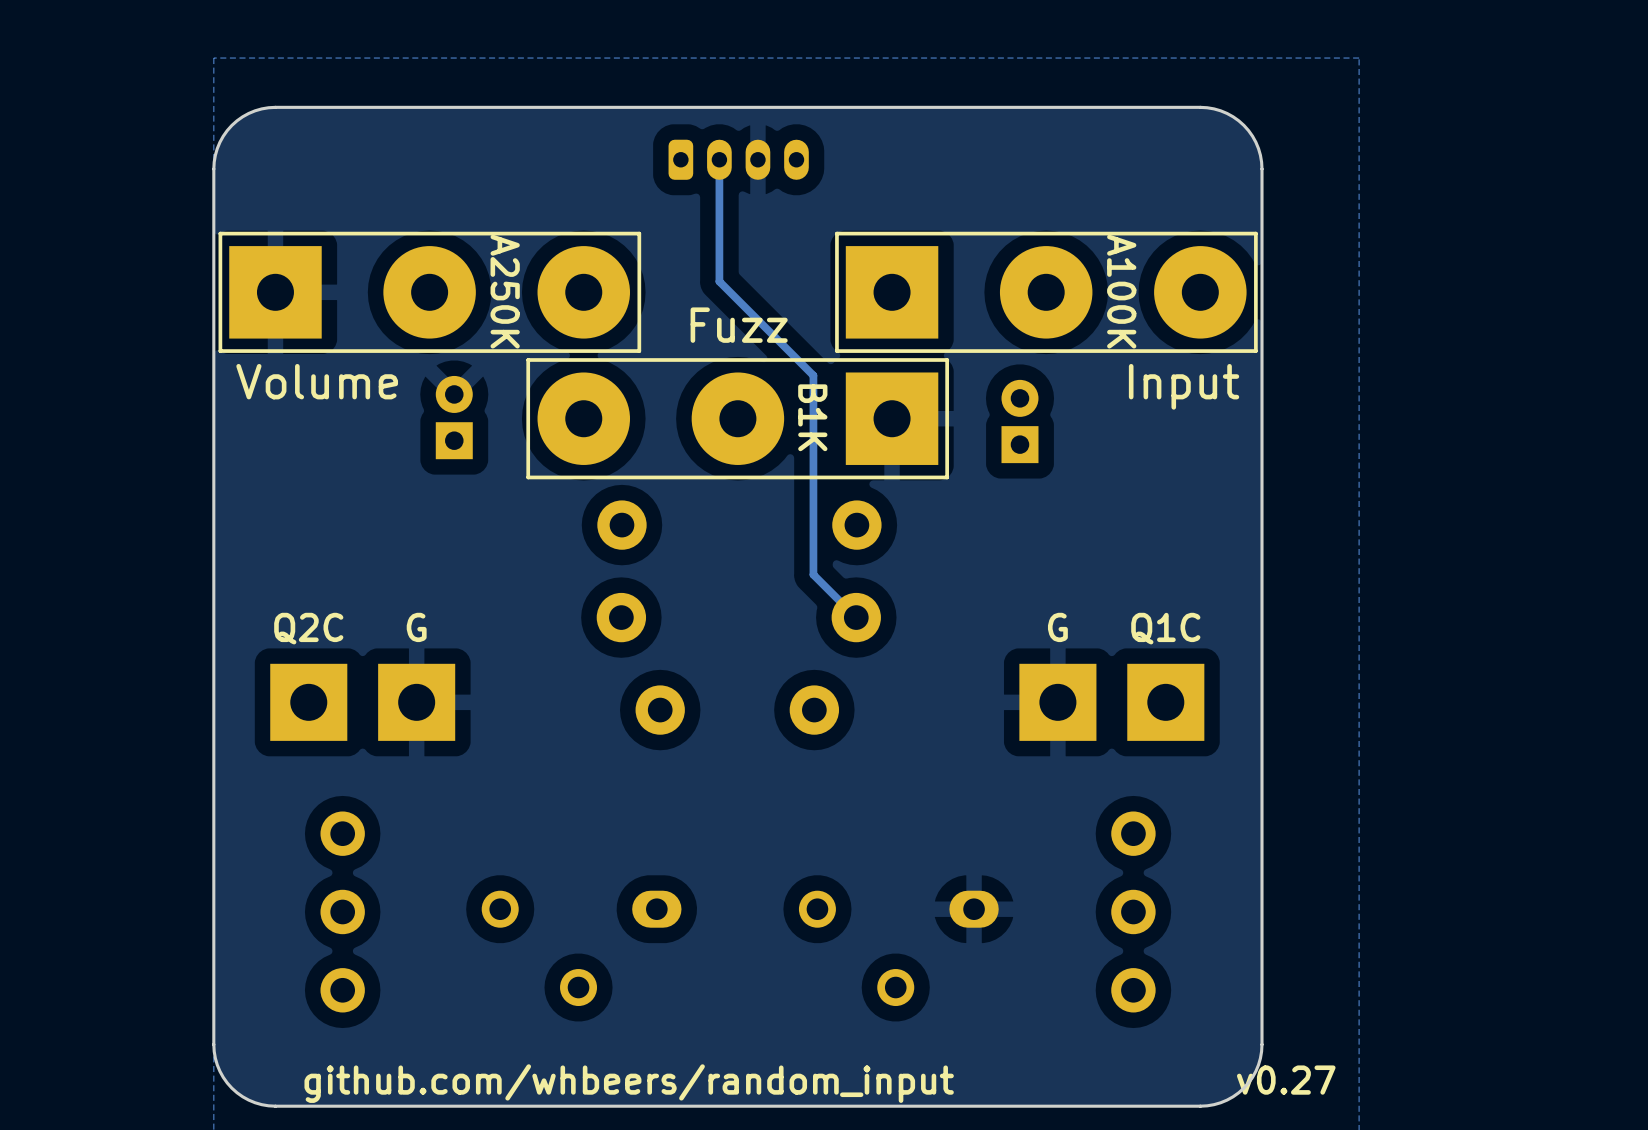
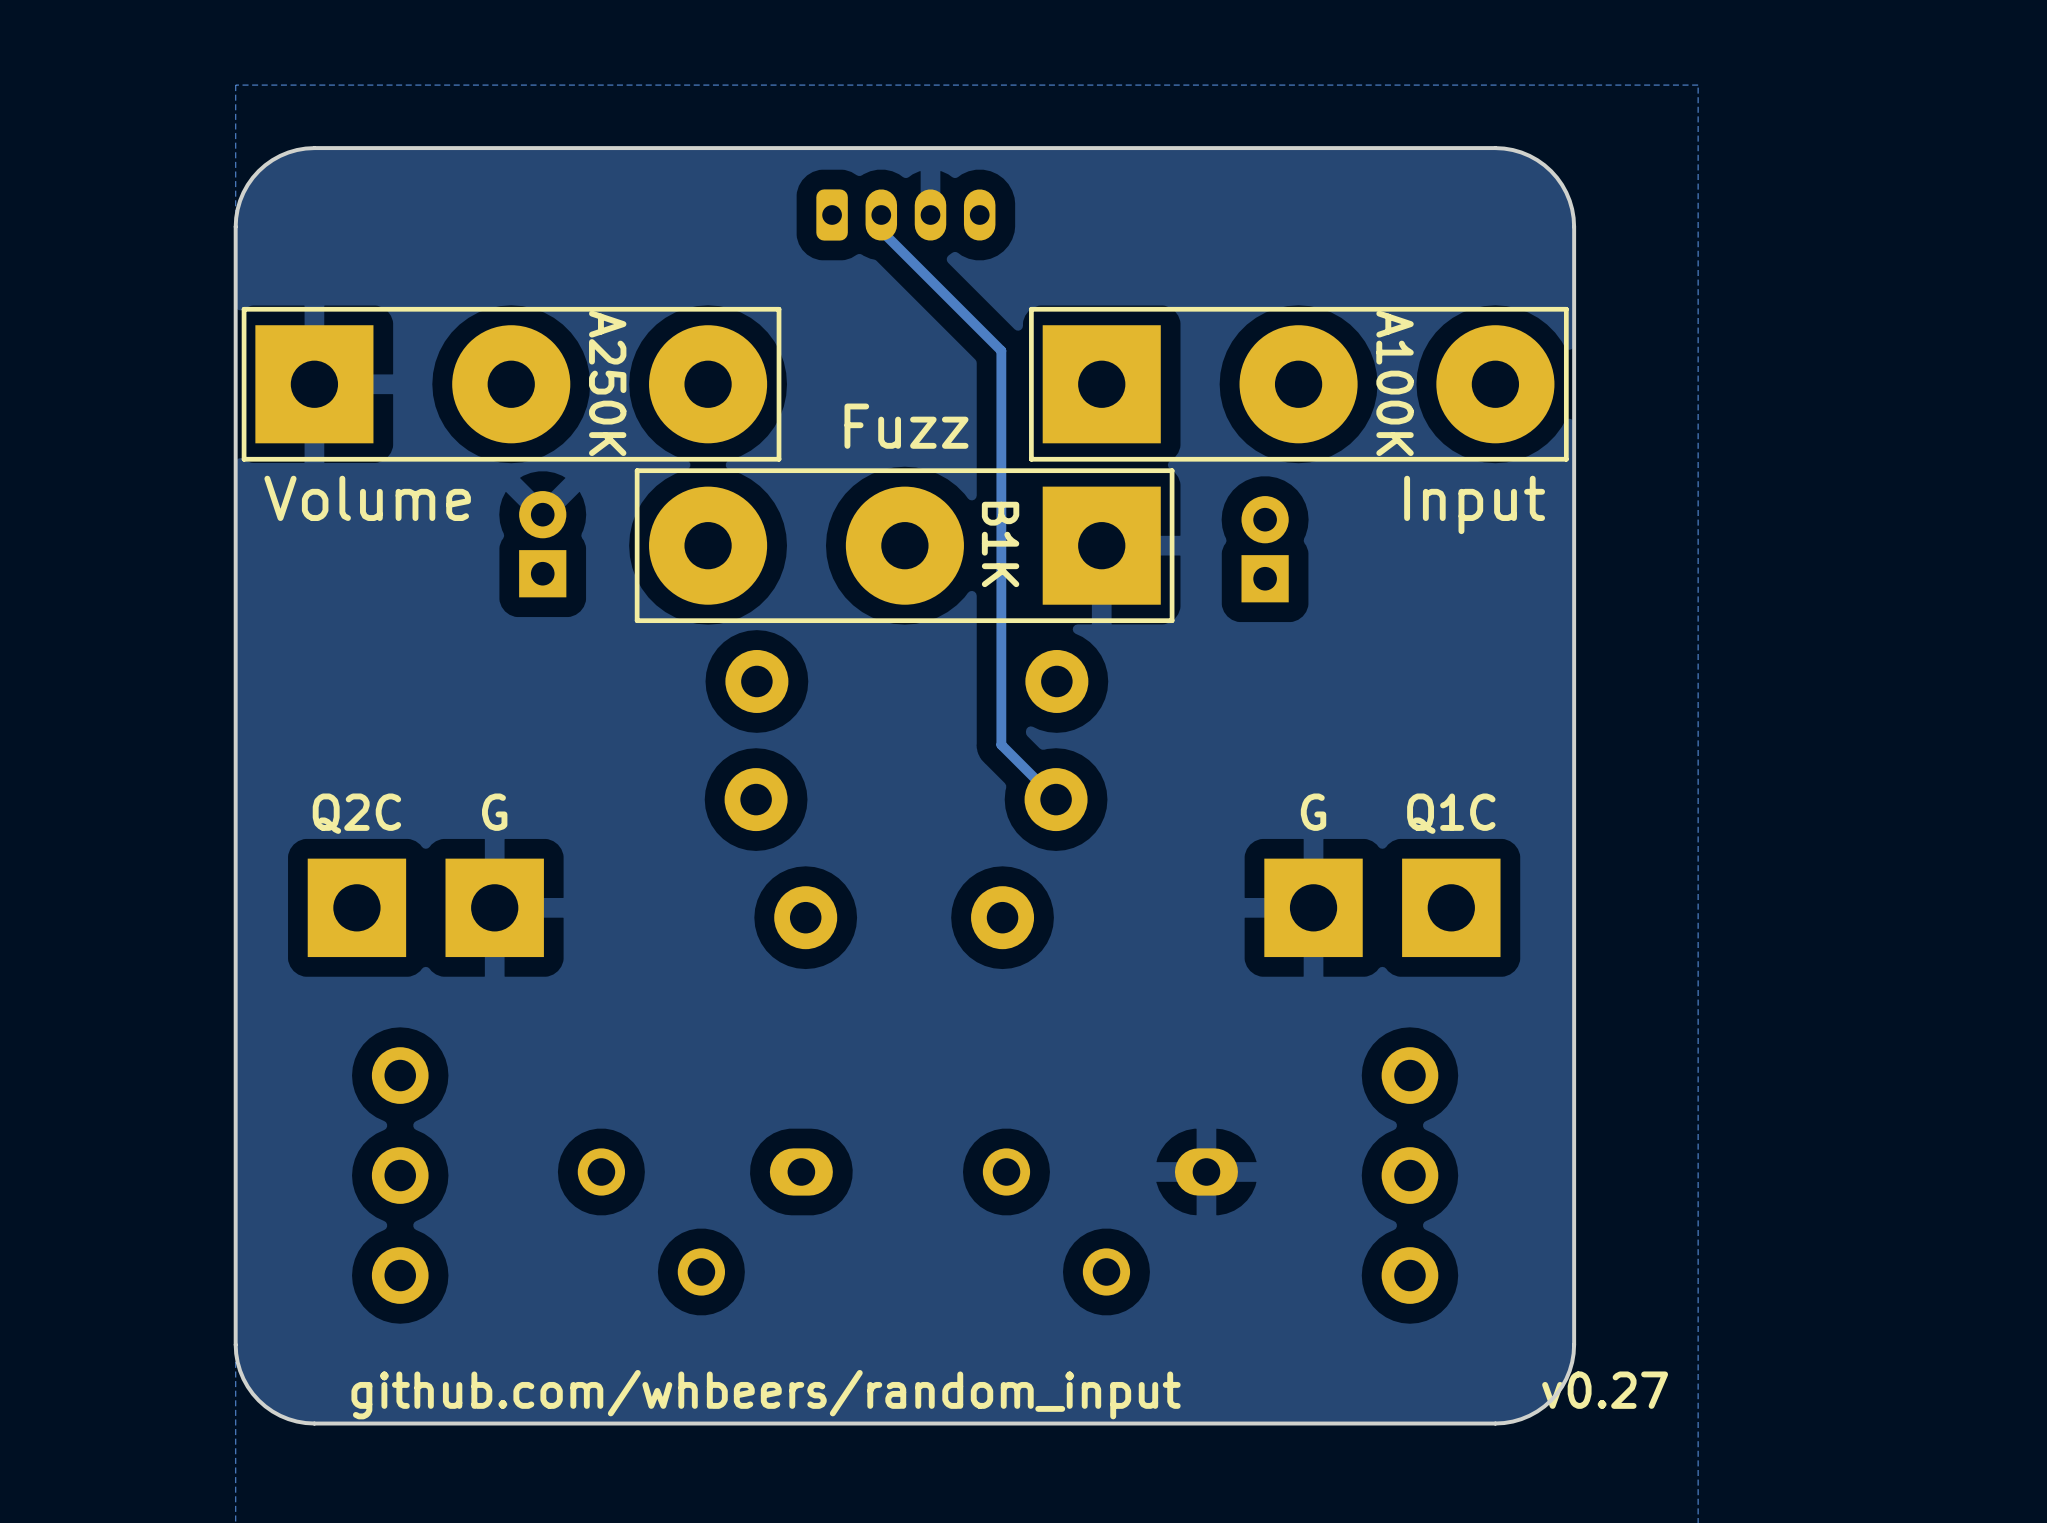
track: (719, 172) (719, 281) (813, 375) -> (881, 230) (1001, 350) (1001, 490)

